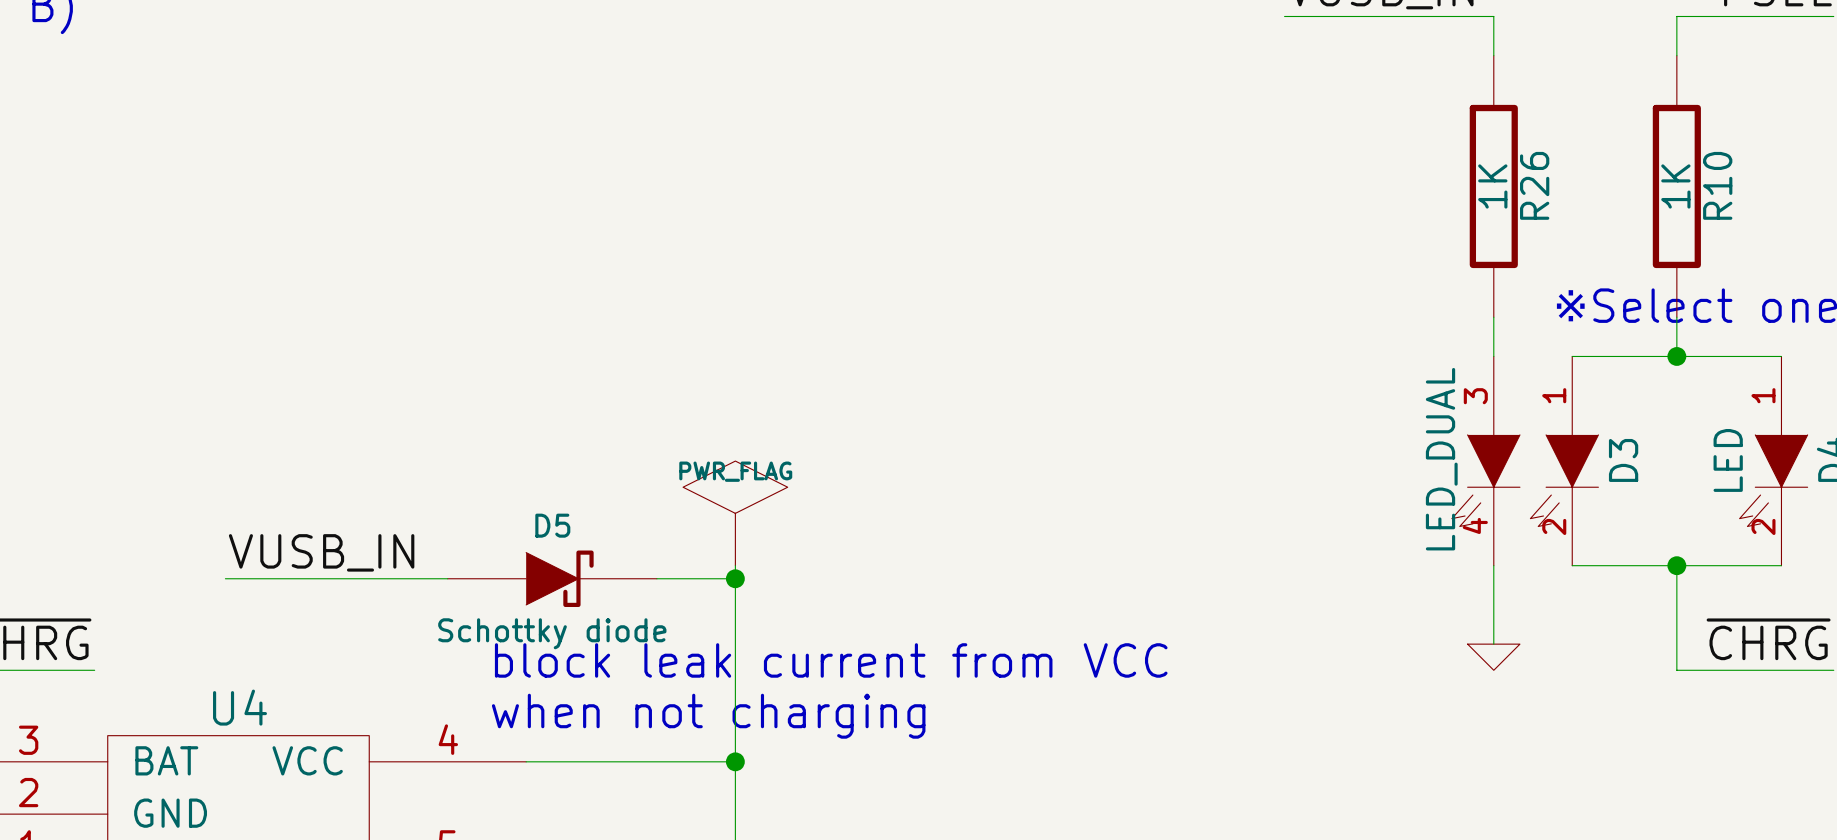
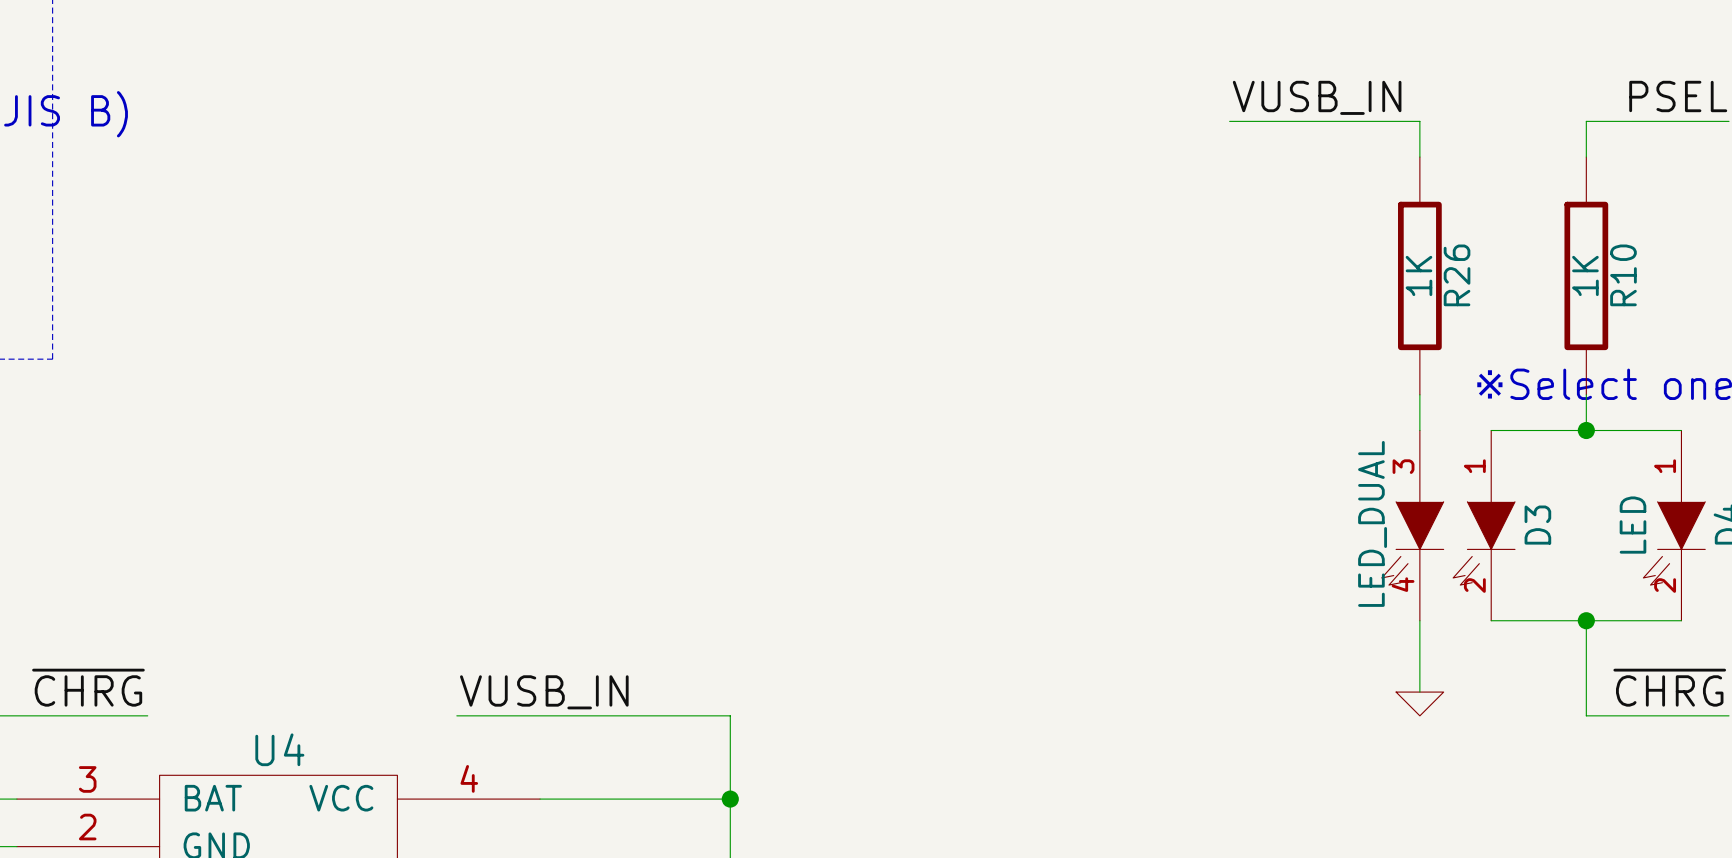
power symbol: PWR_FLAG (735, 513) -> none
label position: VUSB_IN (321, 552) -> VUSB_IN (544, 692)
wire: (735, 565) (735, 670) -> (456, 715) (730, 715)
wire: (225, 578) (447, 578) -> none
D5: Schottky diode (552, 578) -> none
wire: (656, 578) (735, 578) -> none
junction: (735, 578) -> none
text: block leak current from VCC (831, 660) -> none
text: when not charging (708, 716) -> none

